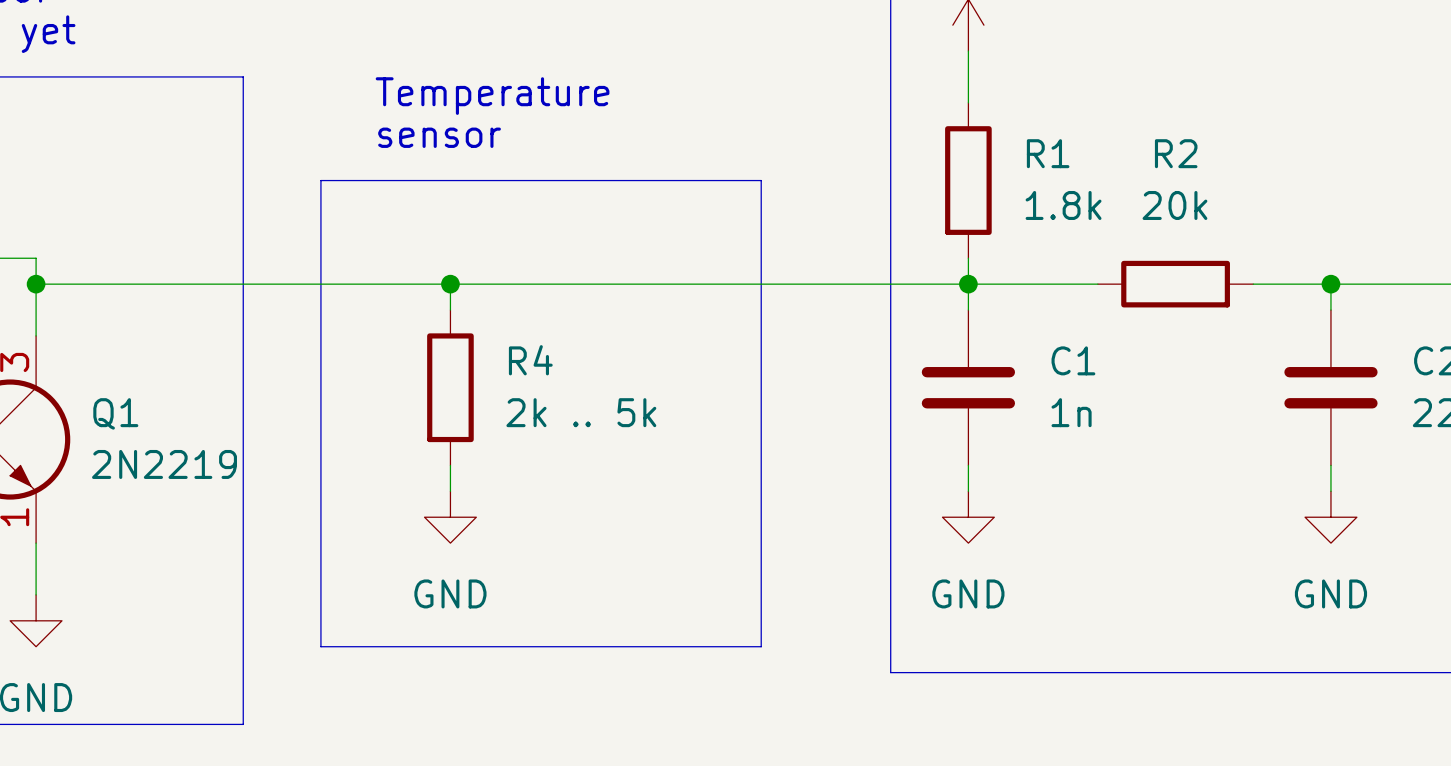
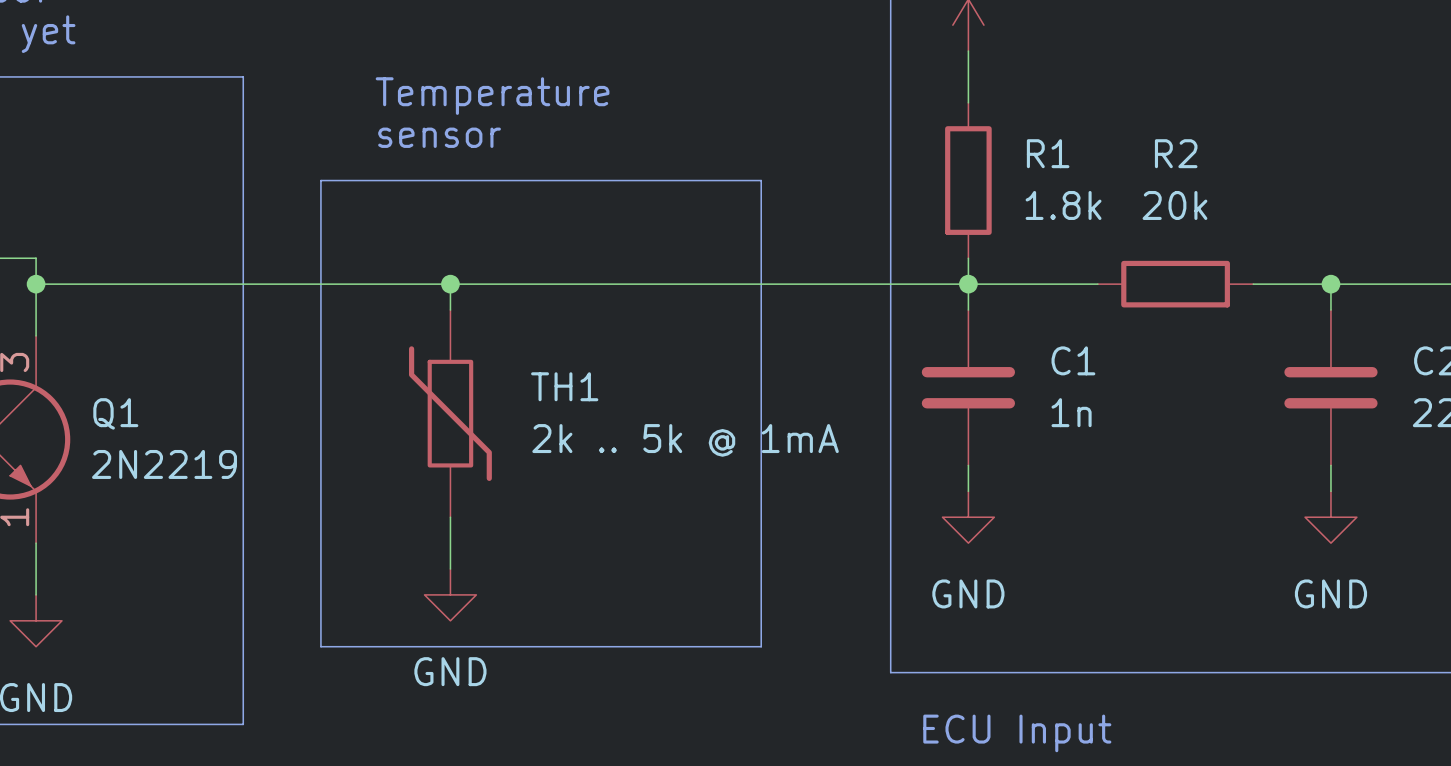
R4: 2k .. 5k (450, 387) -> none
TH1: none -> 2k .. 5k @ 1mA (450, 413)
wire: none -> (450, 517) (450, 569)
power symbol position: GND (450, 517) -> GND (450, 594)
text: none -> ECU Input (1017, 733)

